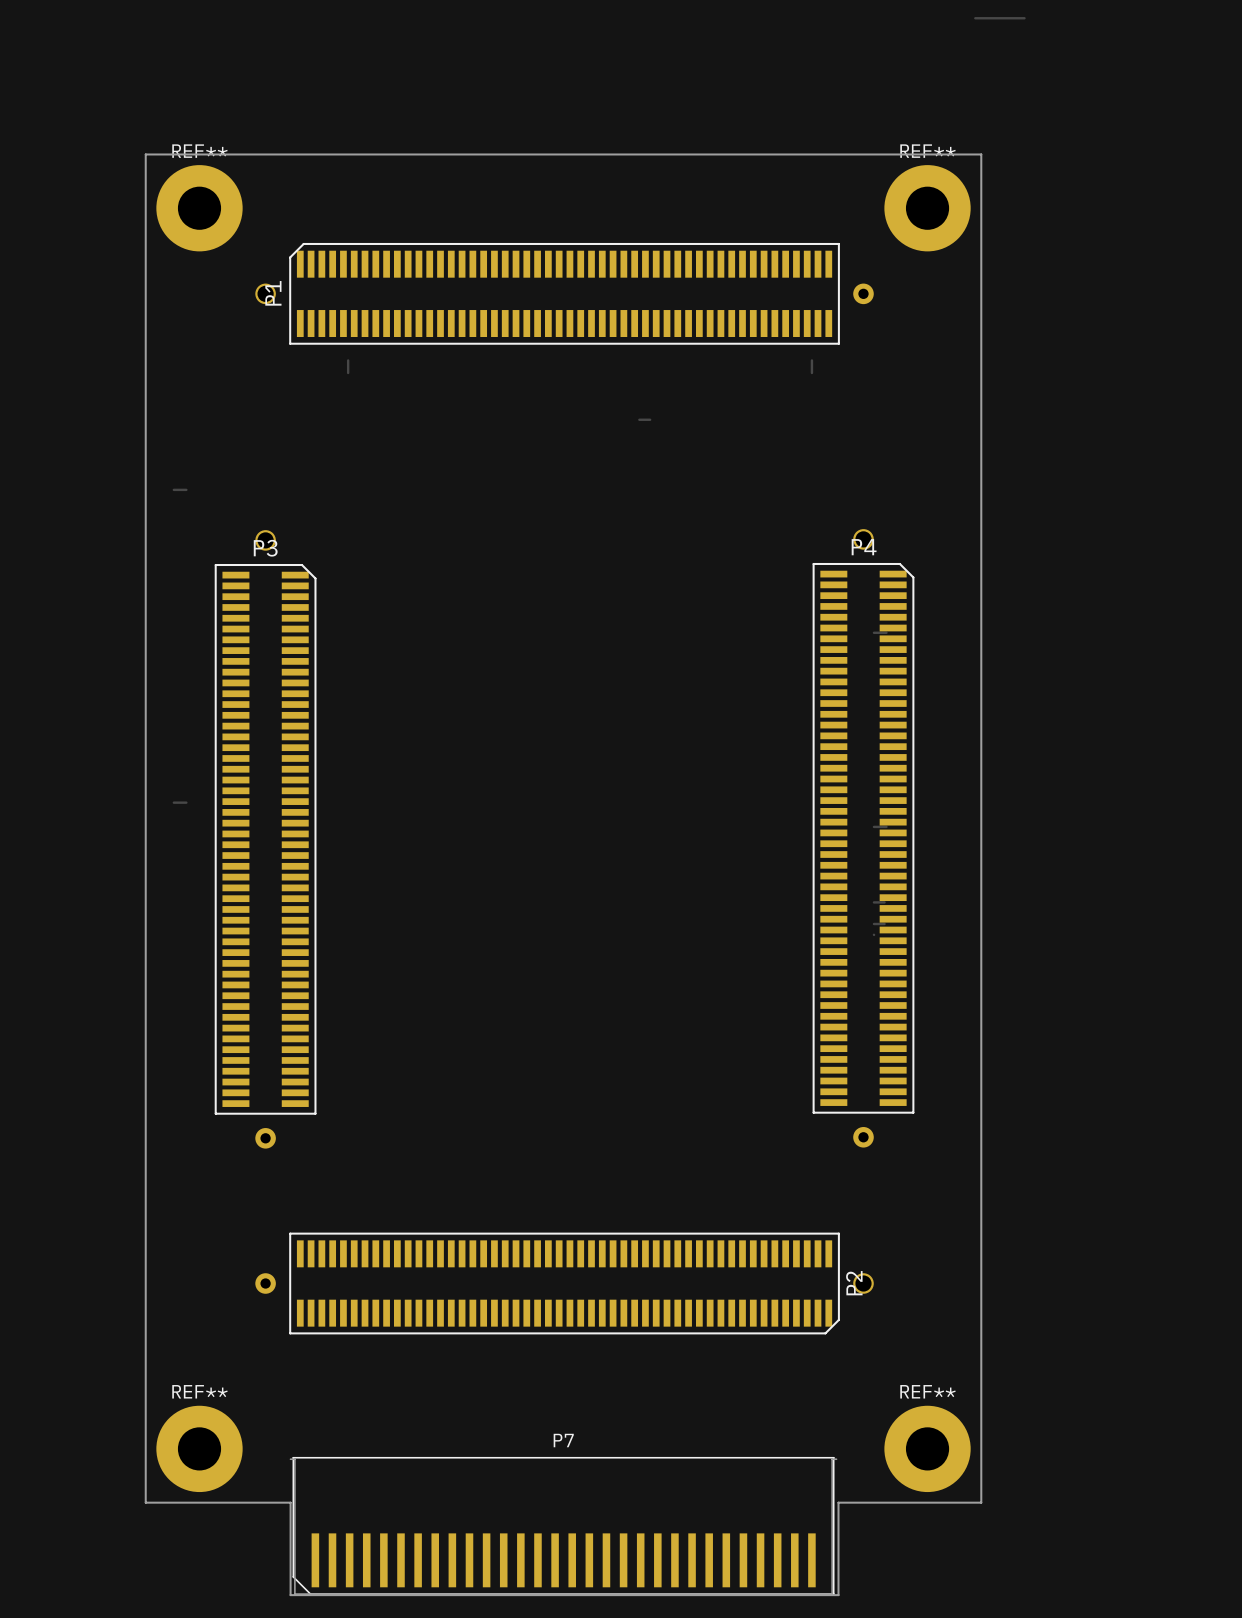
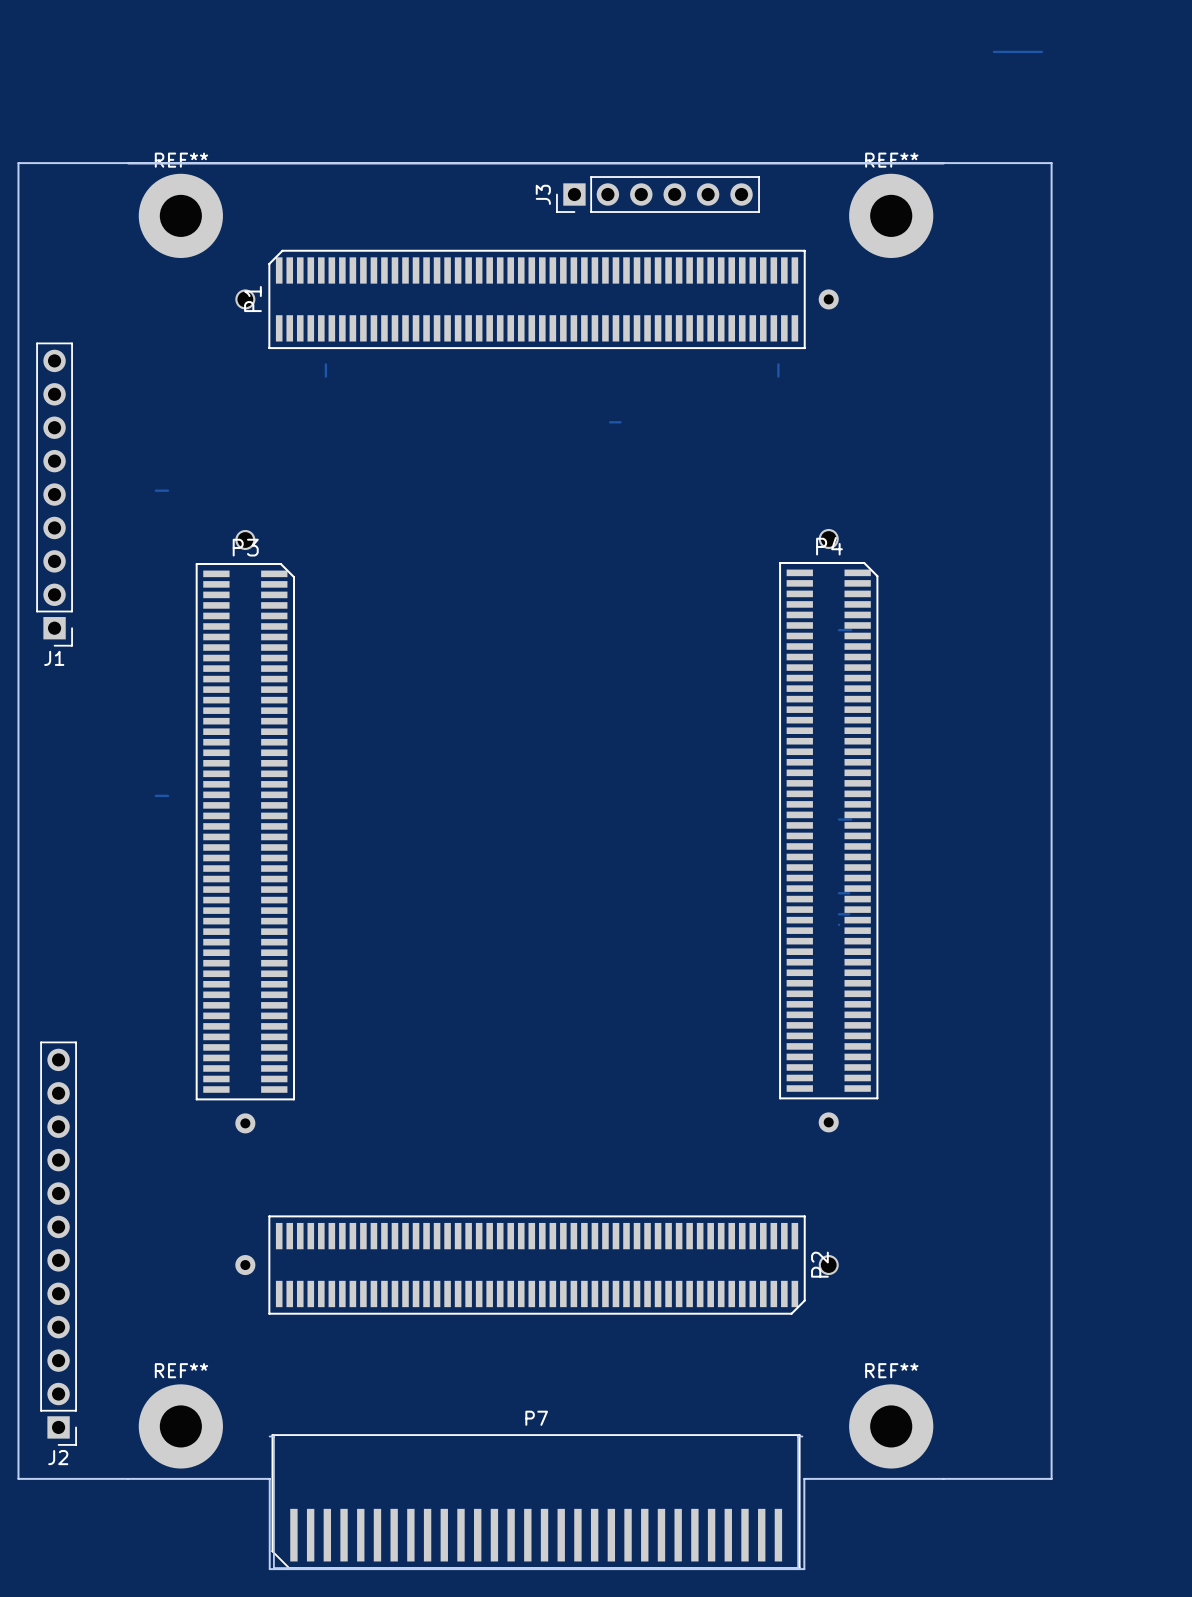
track: (975, 18) (1024, 18) -> (993, 51) (1041, 51)
board edge: (145, 154) (145, 1502) -> none
board edge: (981, 154) (981, 1502) -> (128, 1478) (18, 1478) (18, 163) (1051, 163) (1051, 1478) (943, 1478)
J3: none -> (657, 194)
J1: none -> (54, 494)
J2: none -> (58, 1243)

